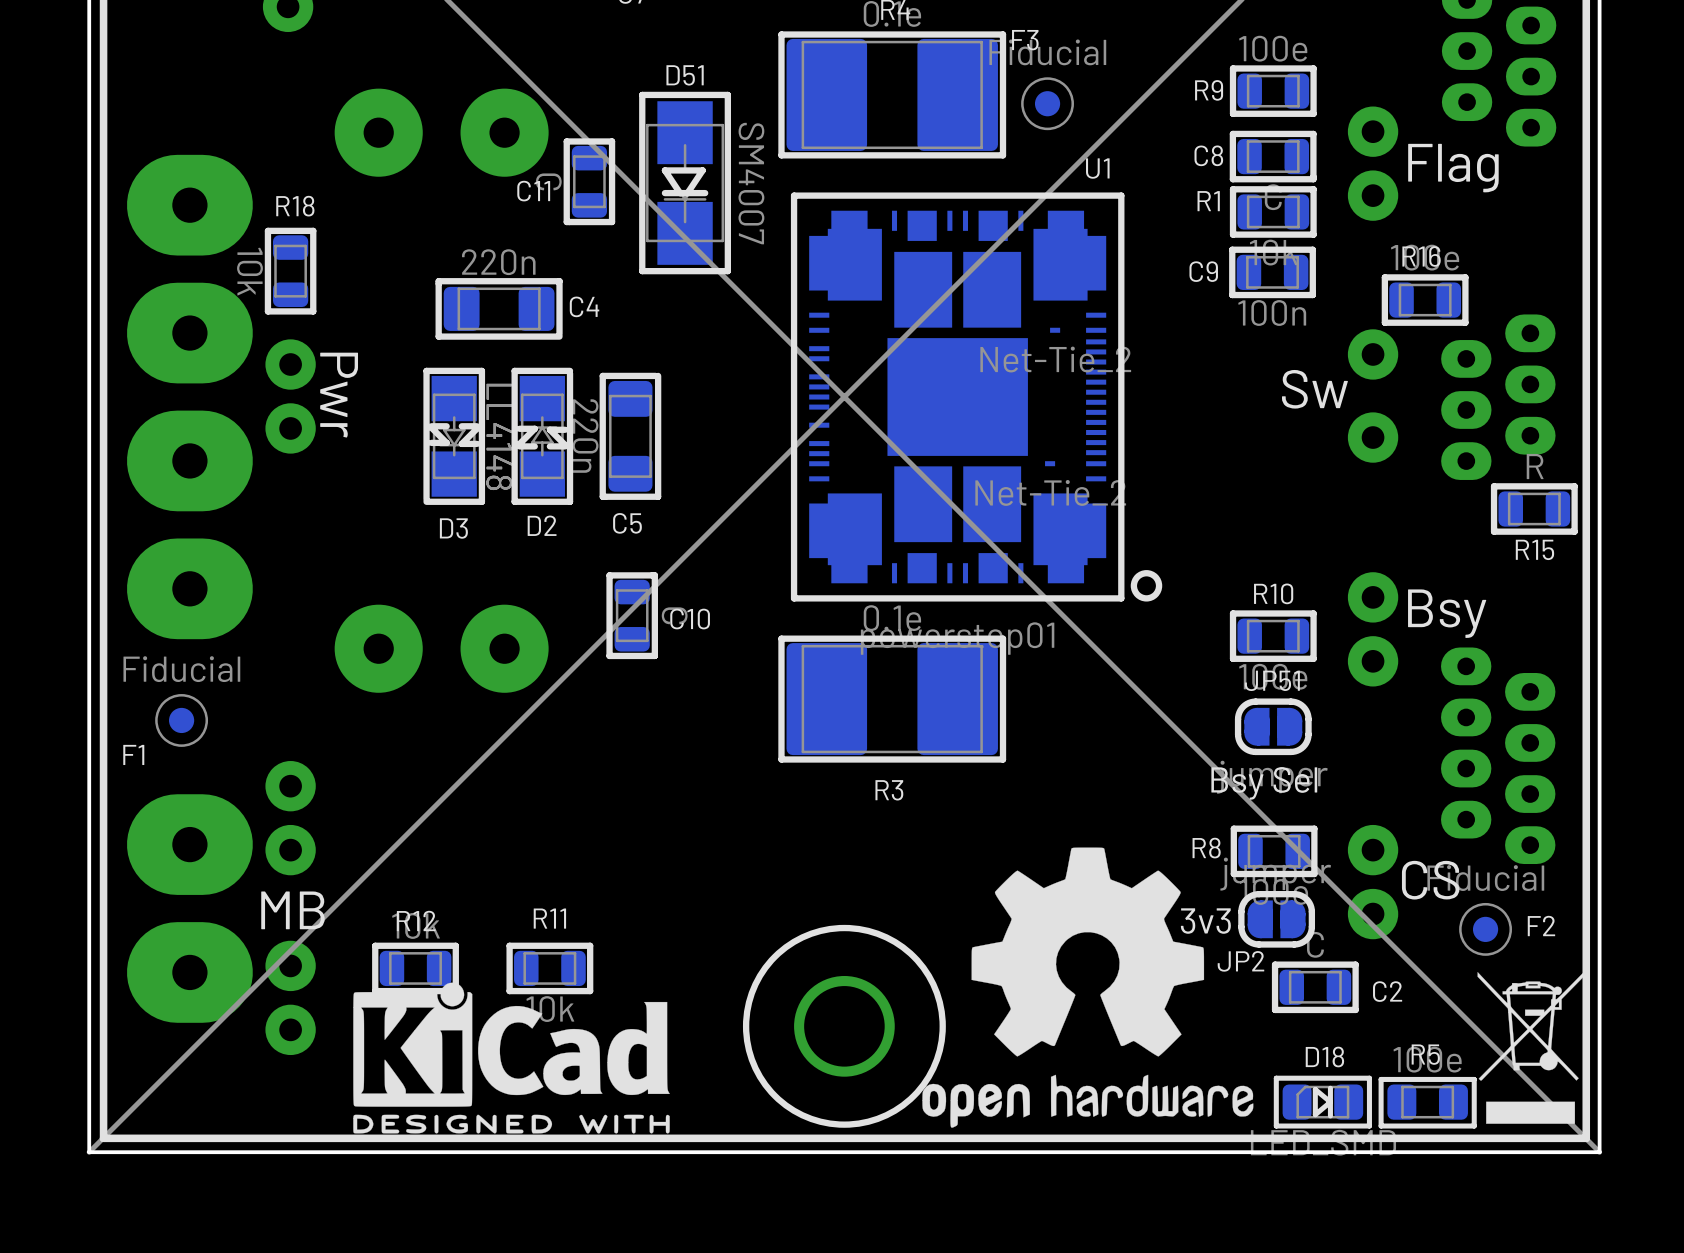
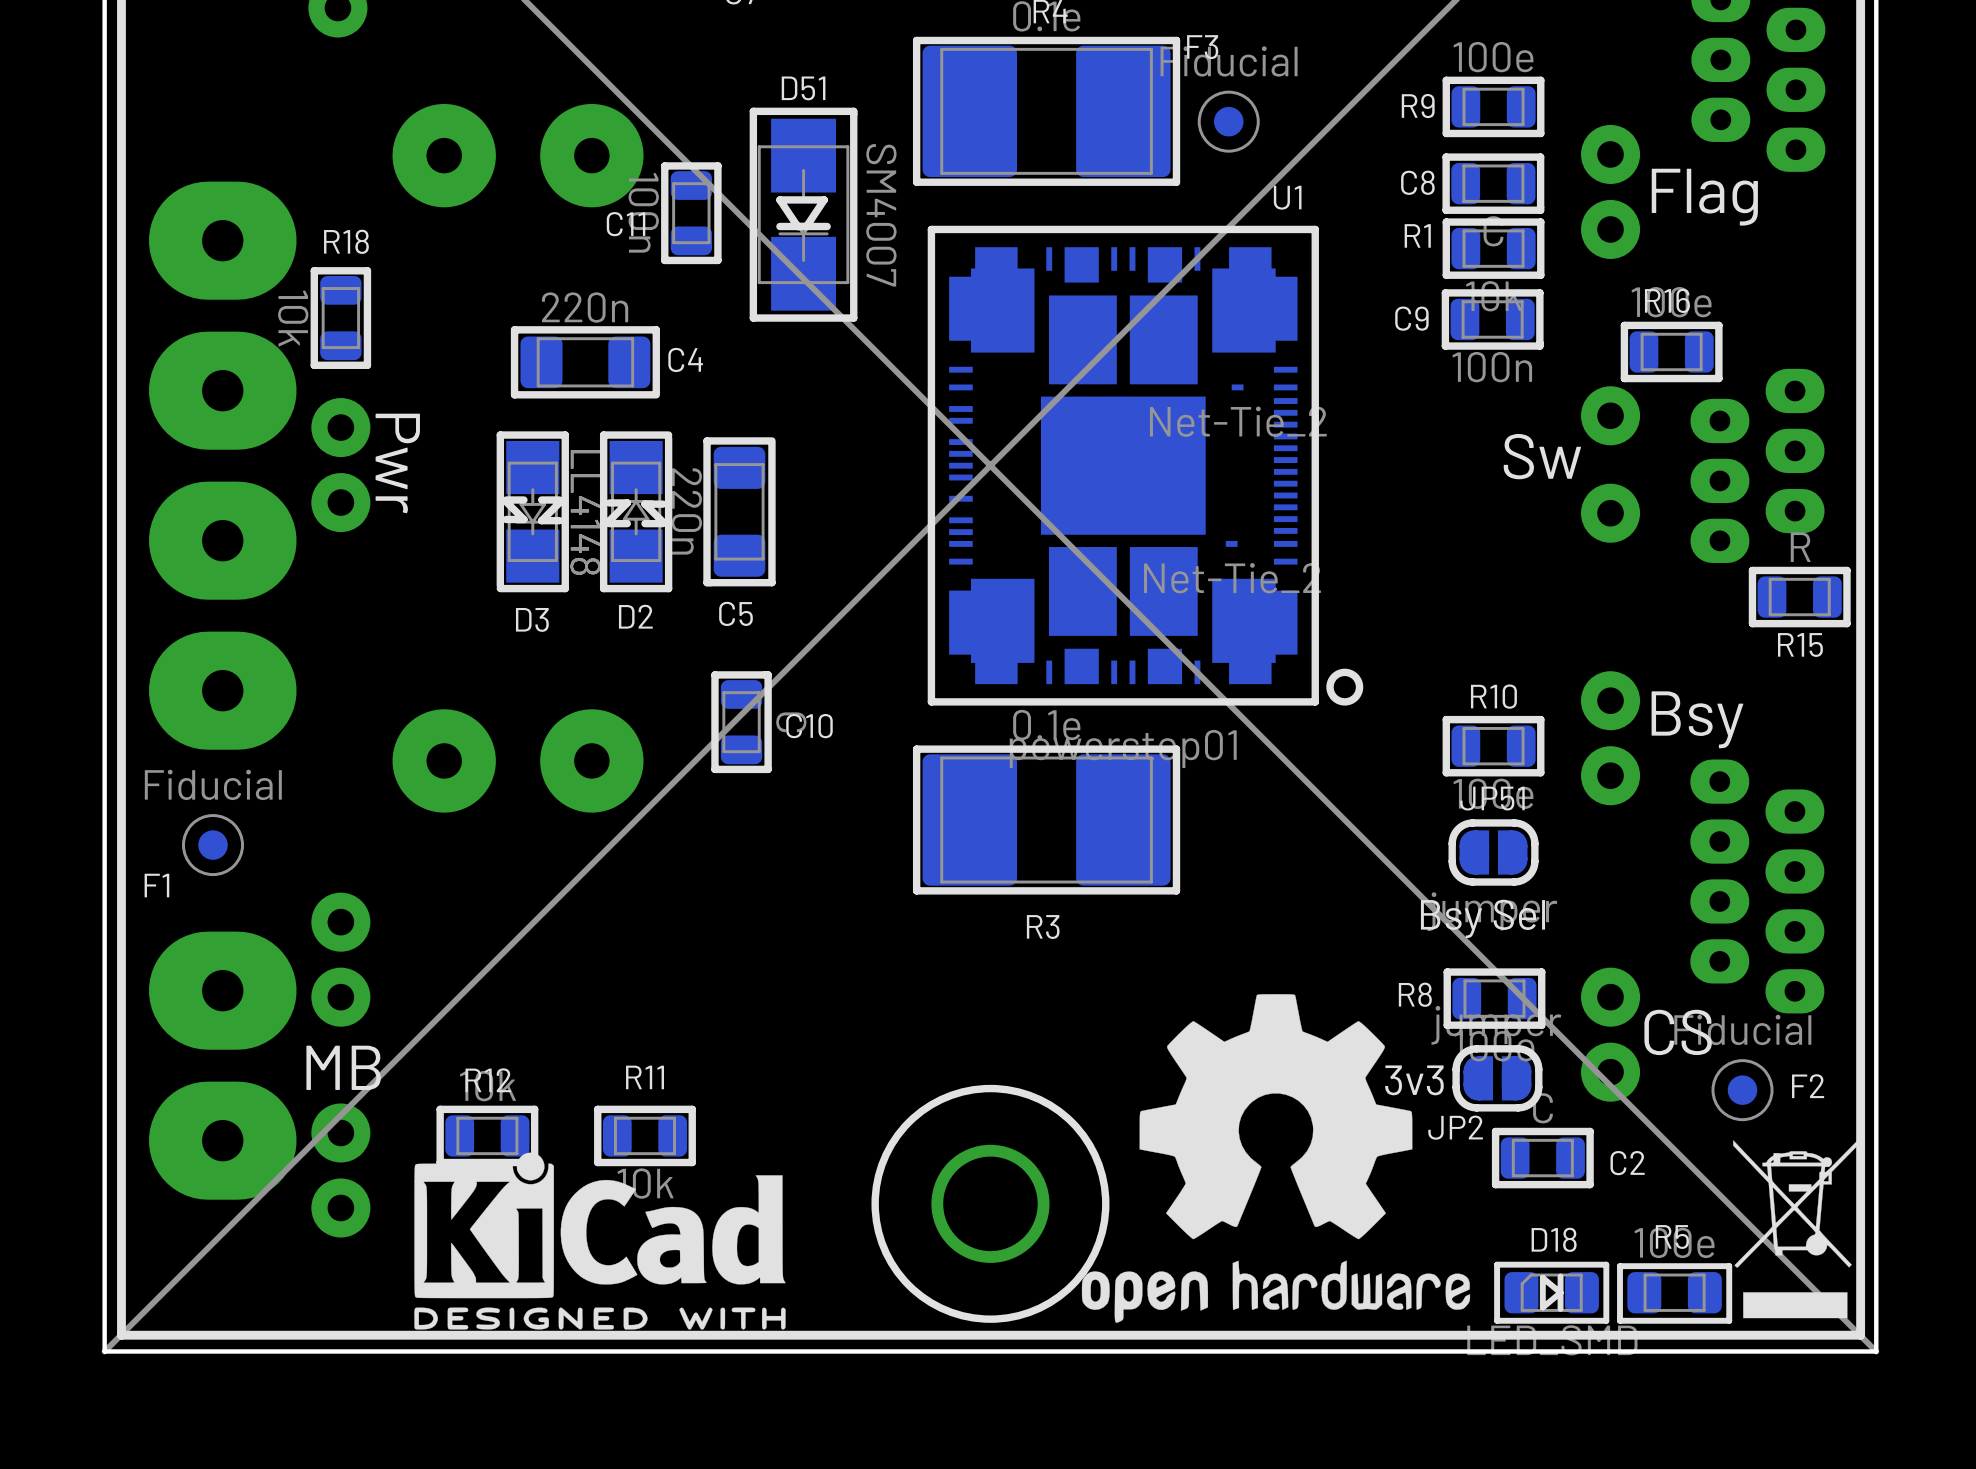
C11 value: C (548, 181) -> 100n (643, 212)

